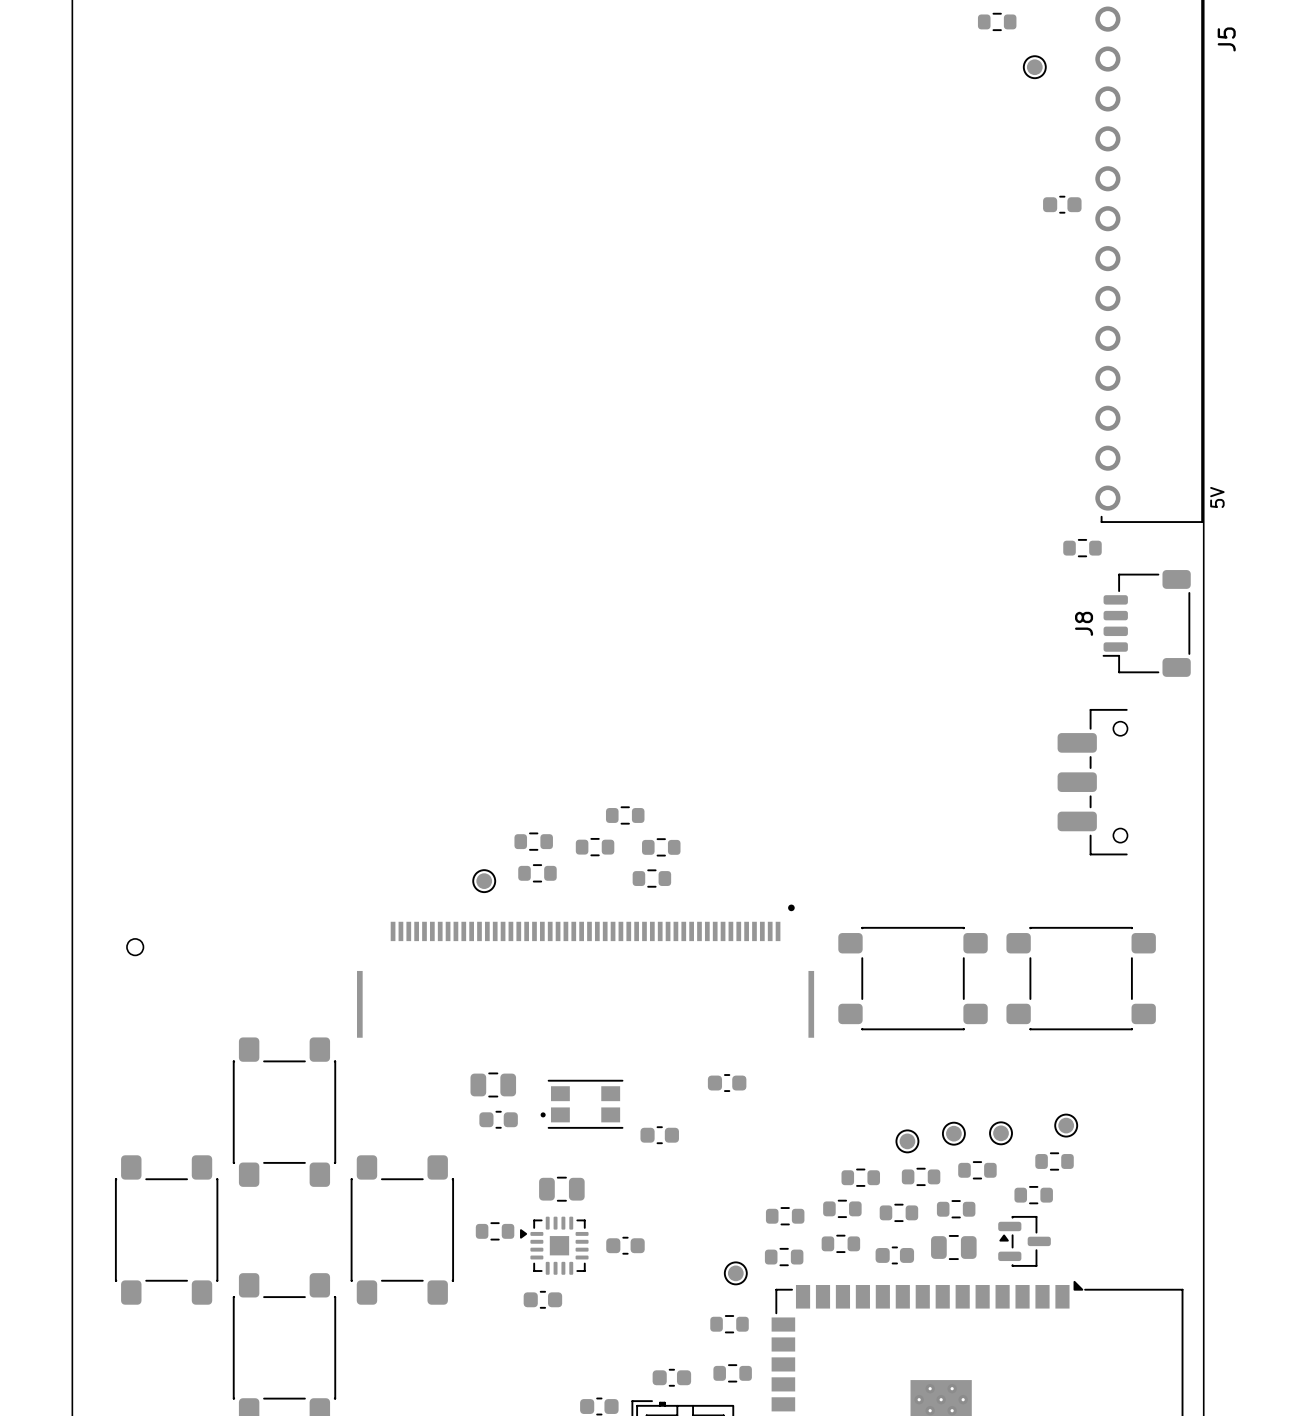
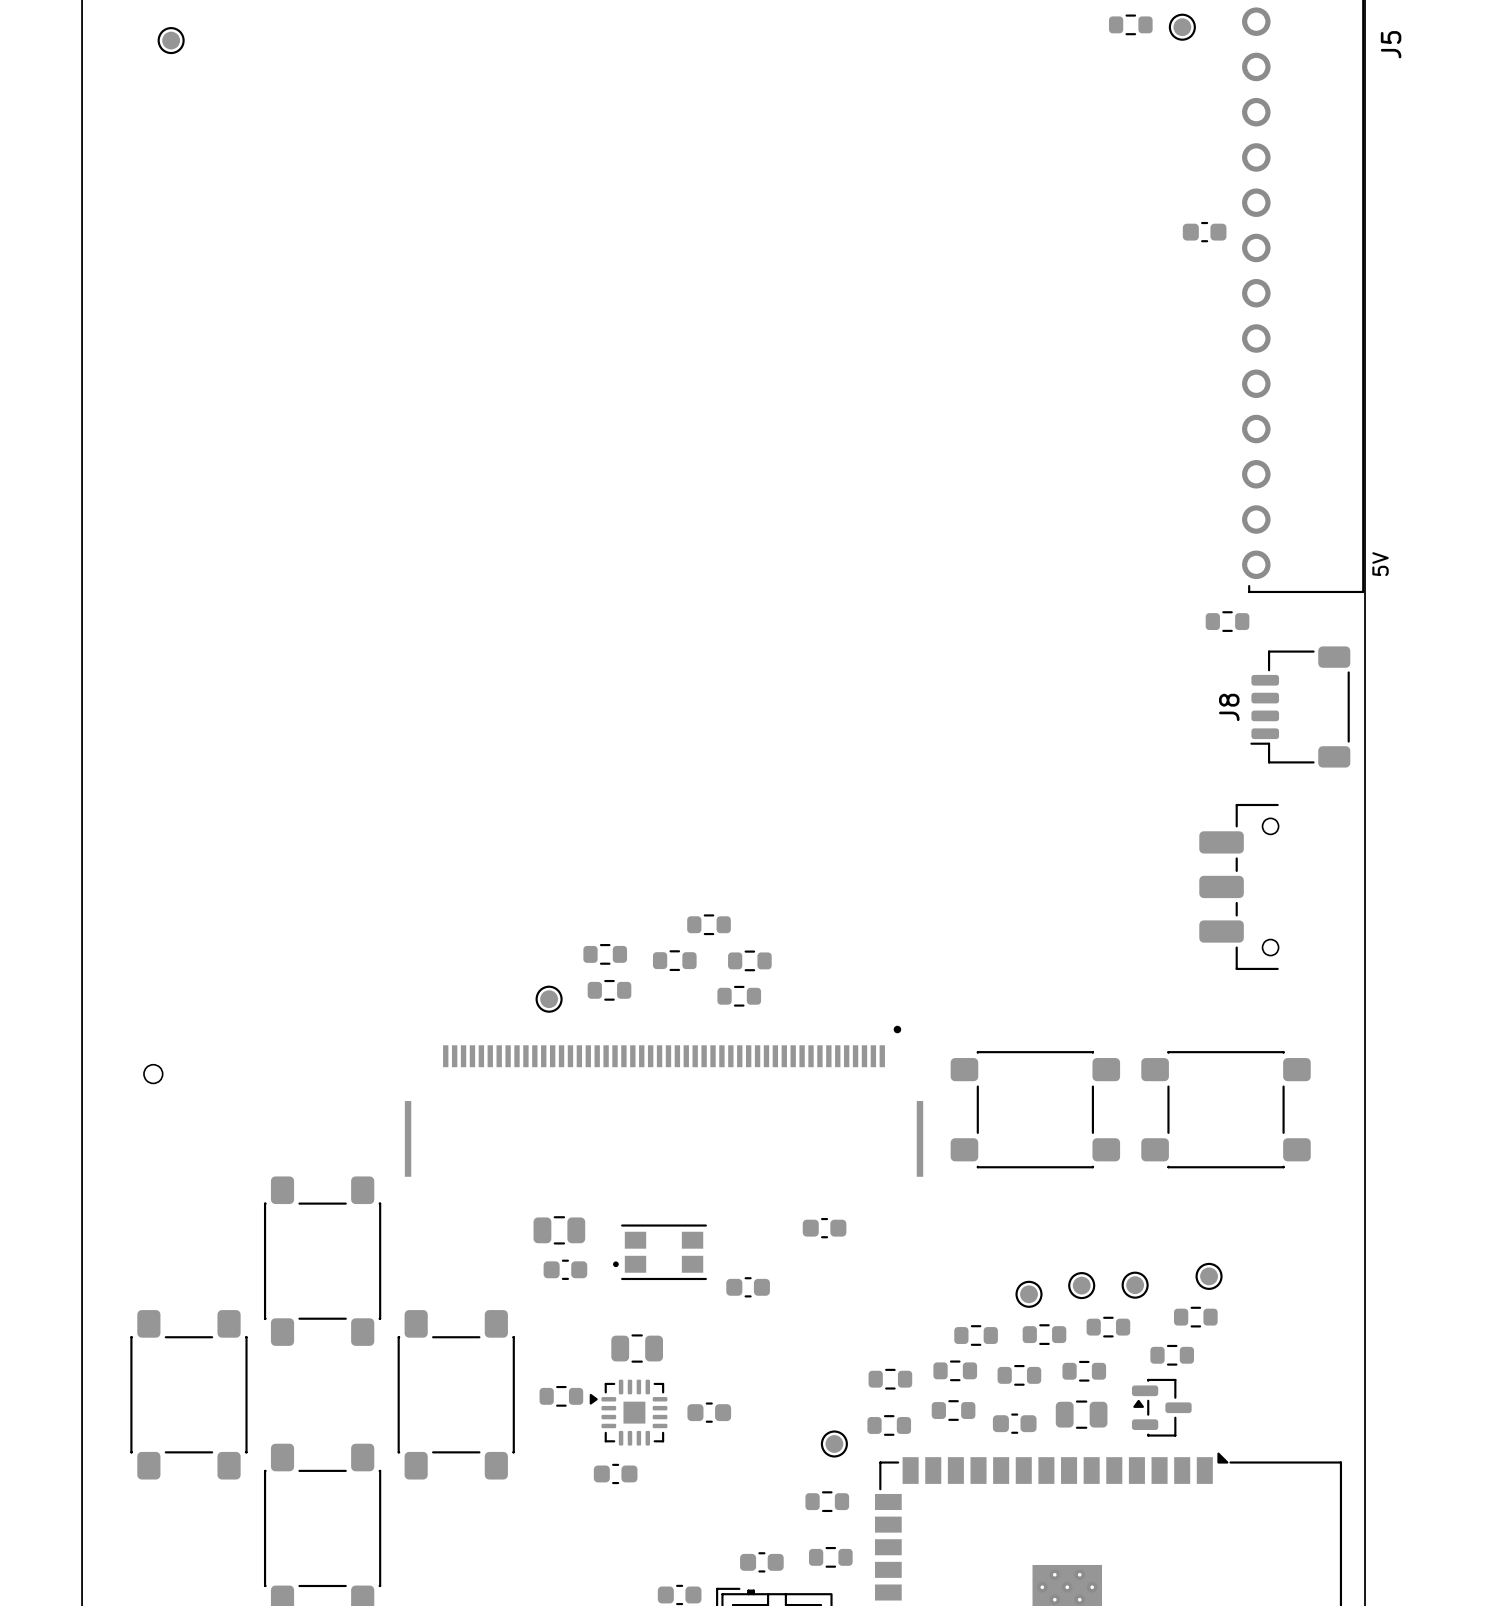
part: none -> (1182, 27)
part: none -> (171, 40)
part: (1034, 67) -> none

